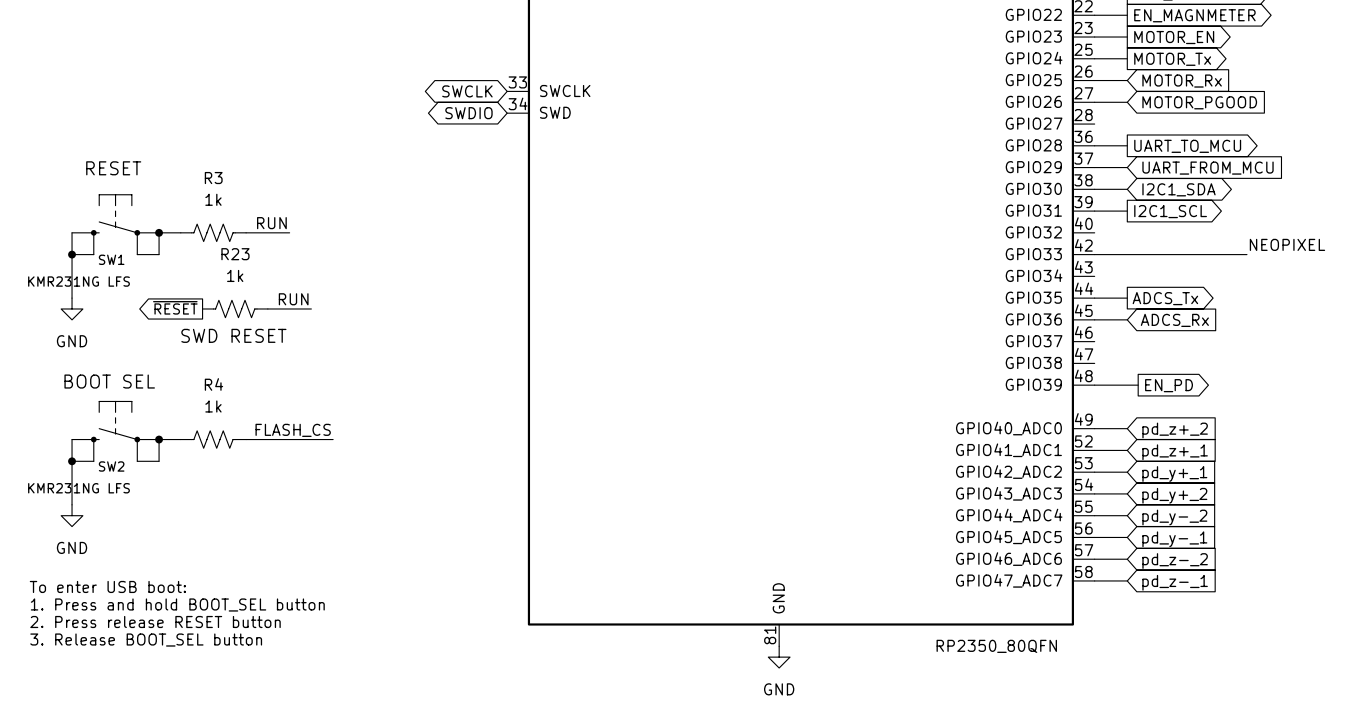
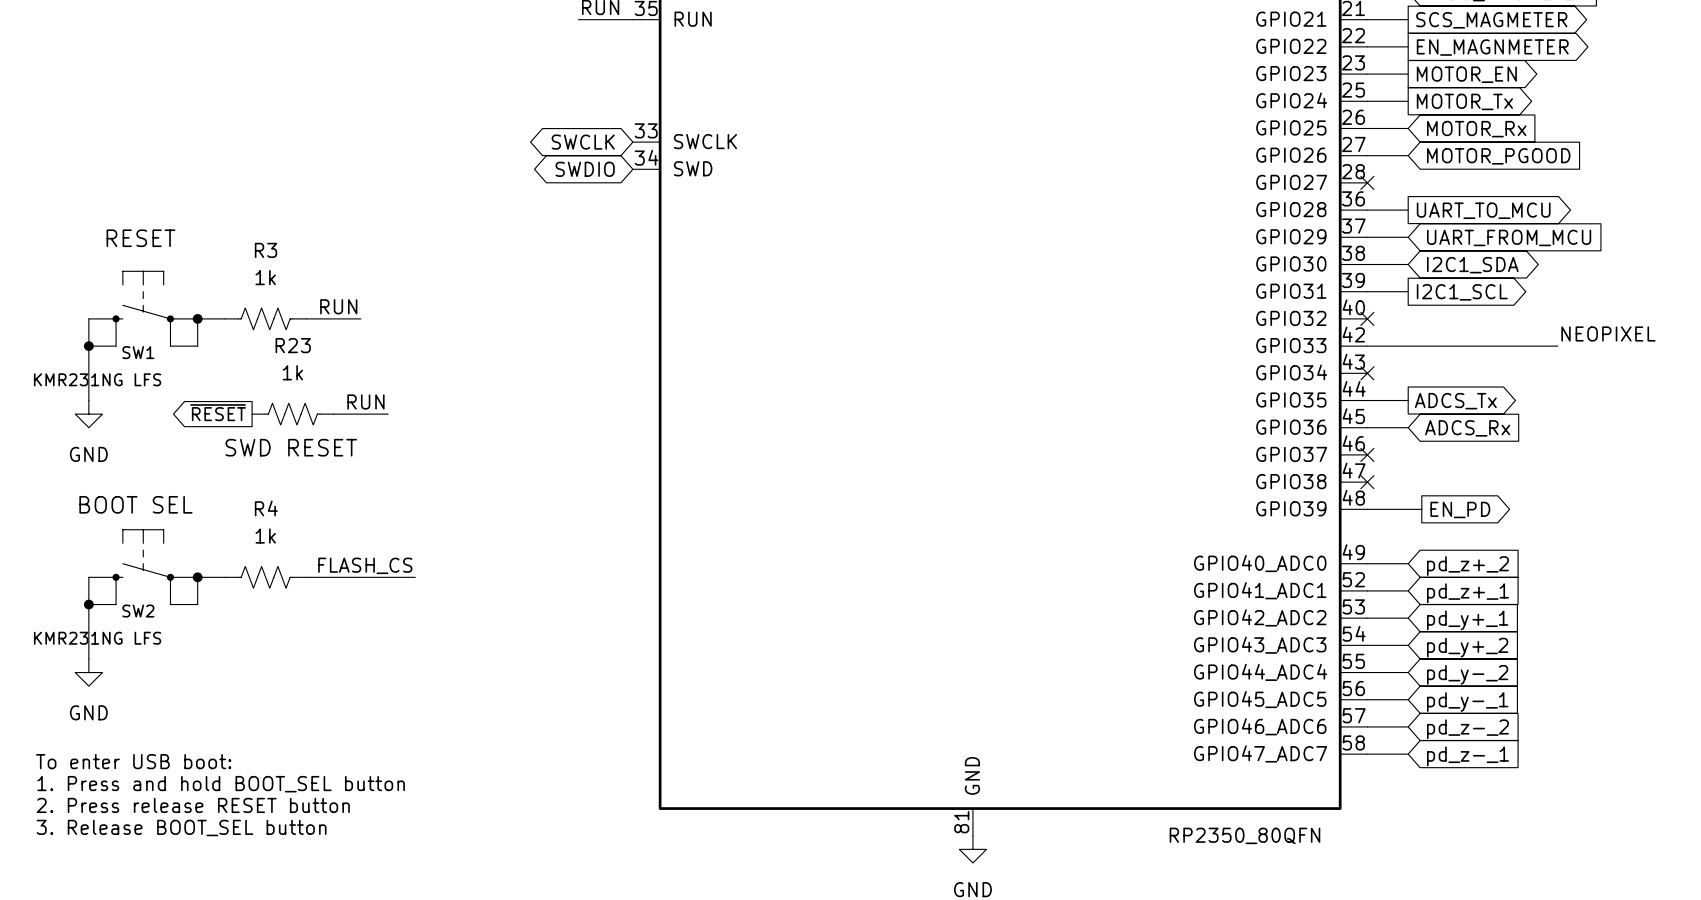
no-connect mark: none -> (1367, 182)
no-connect mark: none -> (1367, 318)
no-connect mark: none -> (1367, 373)
no-connect mark: none -> (1367, 454)
no-connect mark: none -> (1367, 482)

